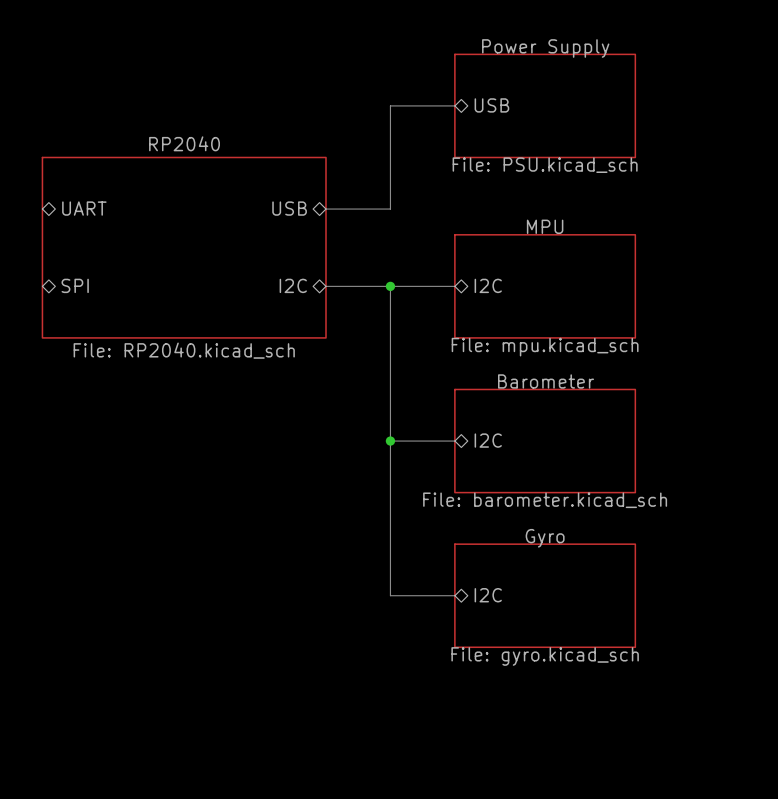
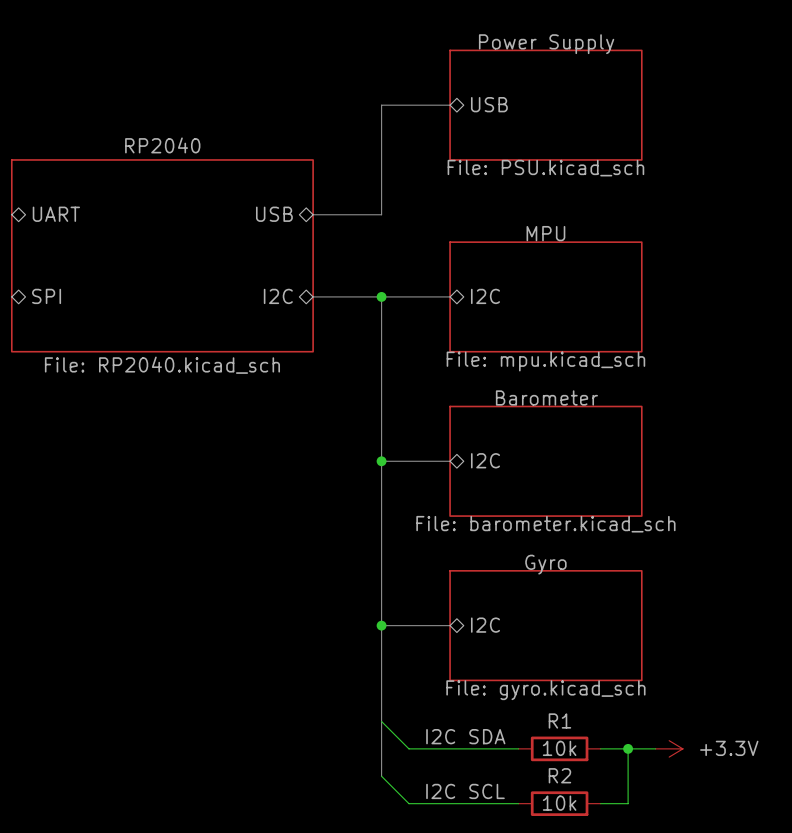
bus: none -> (381, 625) (381, 776)
junction: none -> (381, 625)
wire: none -> (381, 721) (408, 748) (518, 748)
label: none -> I2C SDA (465, 736)
R1: none -> 10k (559, 748)
wire: none -> (600, 748) (655, 748)
wire: none -> (628, 748) (628, 803) (600, 803)
junction: none -> (628, 748)
power symbol: none -> +3.3V (669, 748)
wire: none -> (381, 776) (408, 803) (518, 803)
label: none -> I2C SCL (465, 791)
R2: none -> 10k (559, 803)

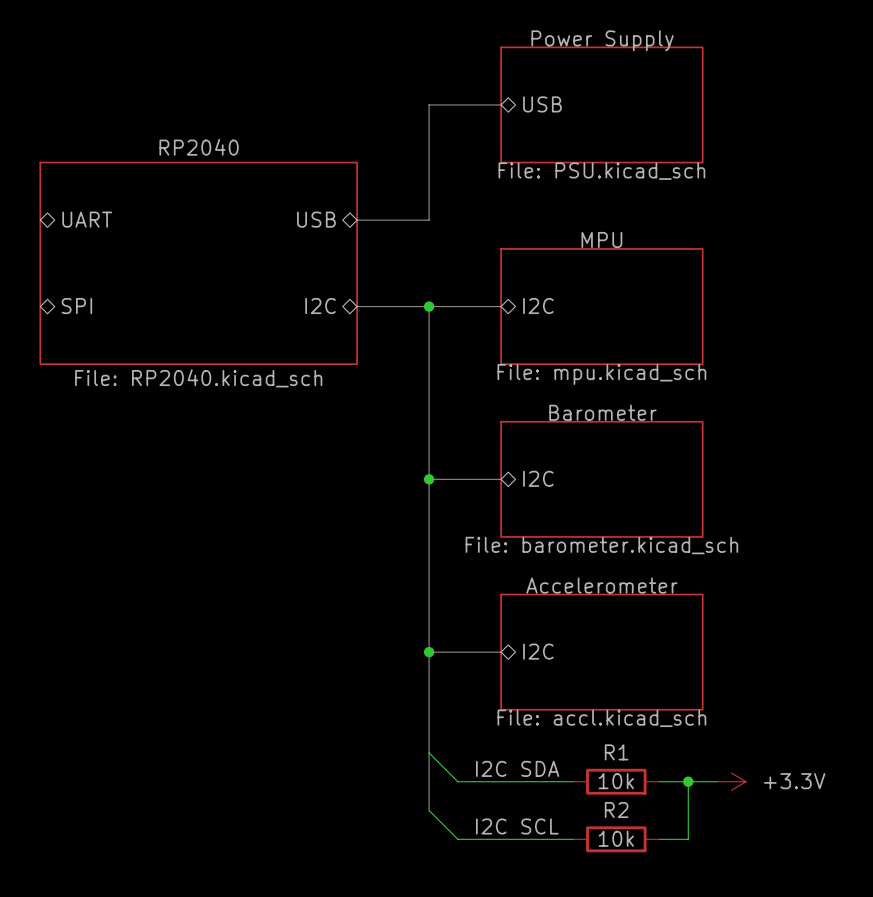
sheet Gyro name: Gyro (545, 564) -> Accelerometer (601, 585)
sheet Gyro value: File: gyro.kicad_sch (545, 690) -> File: accl.kicad_sch (601, 718)

